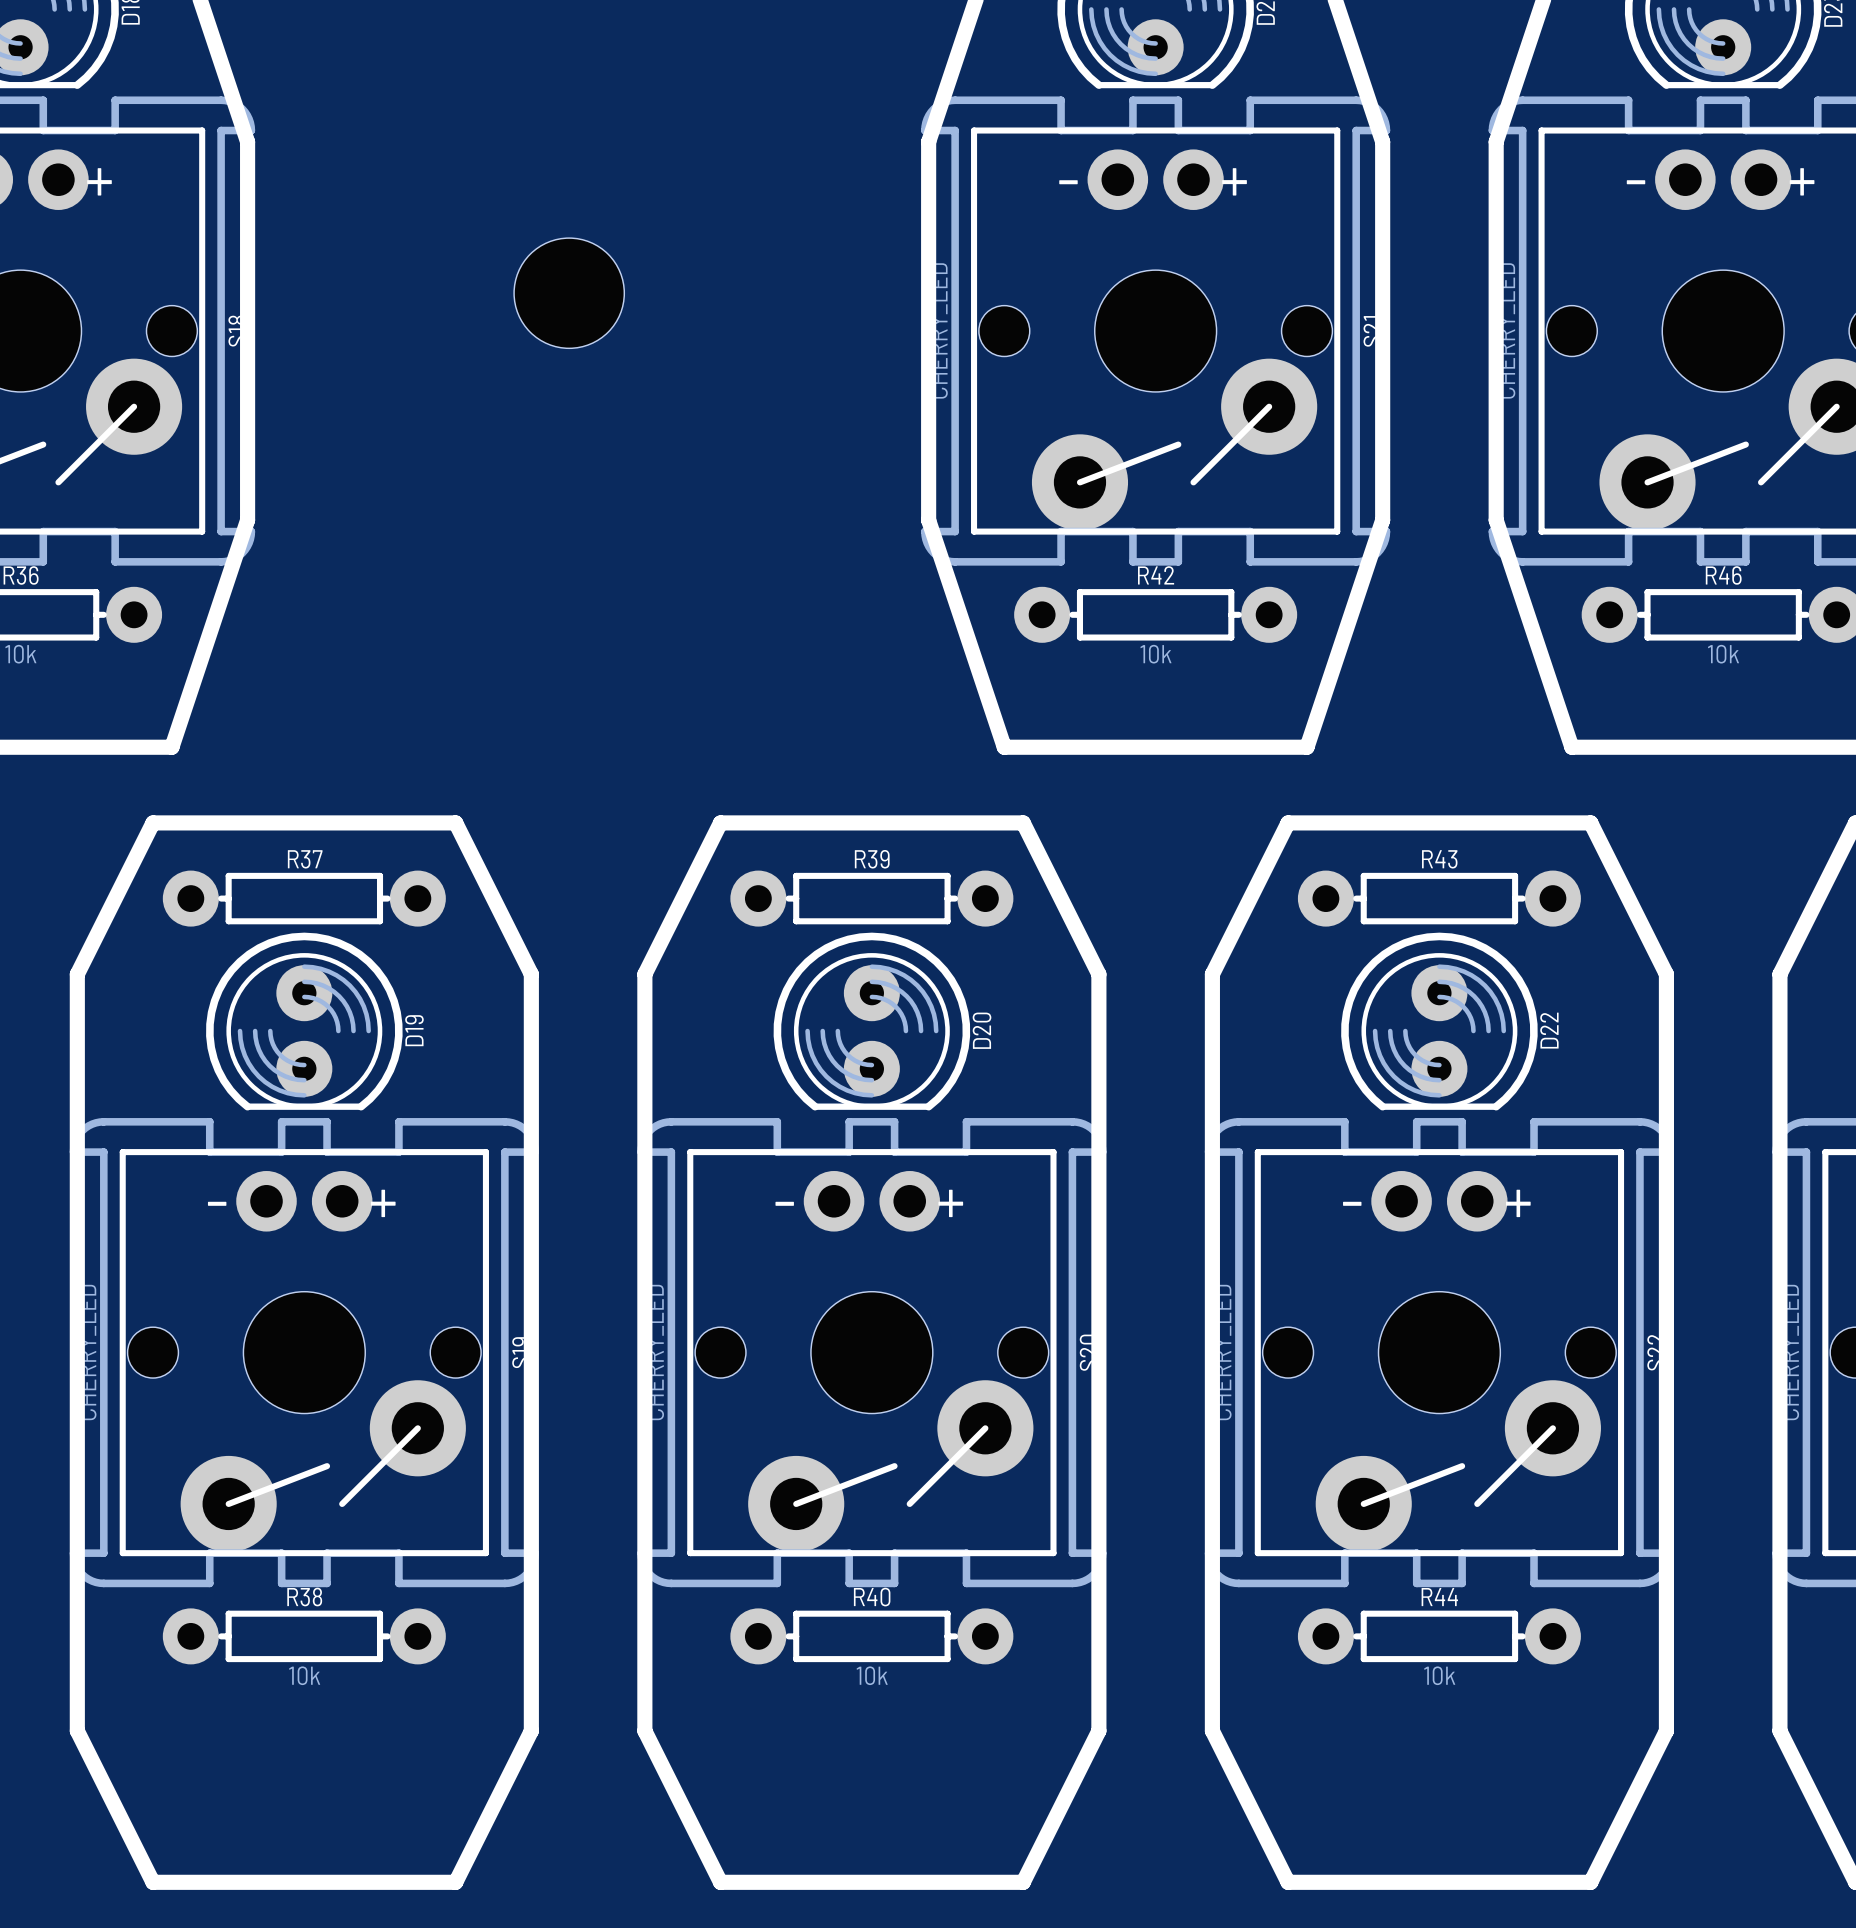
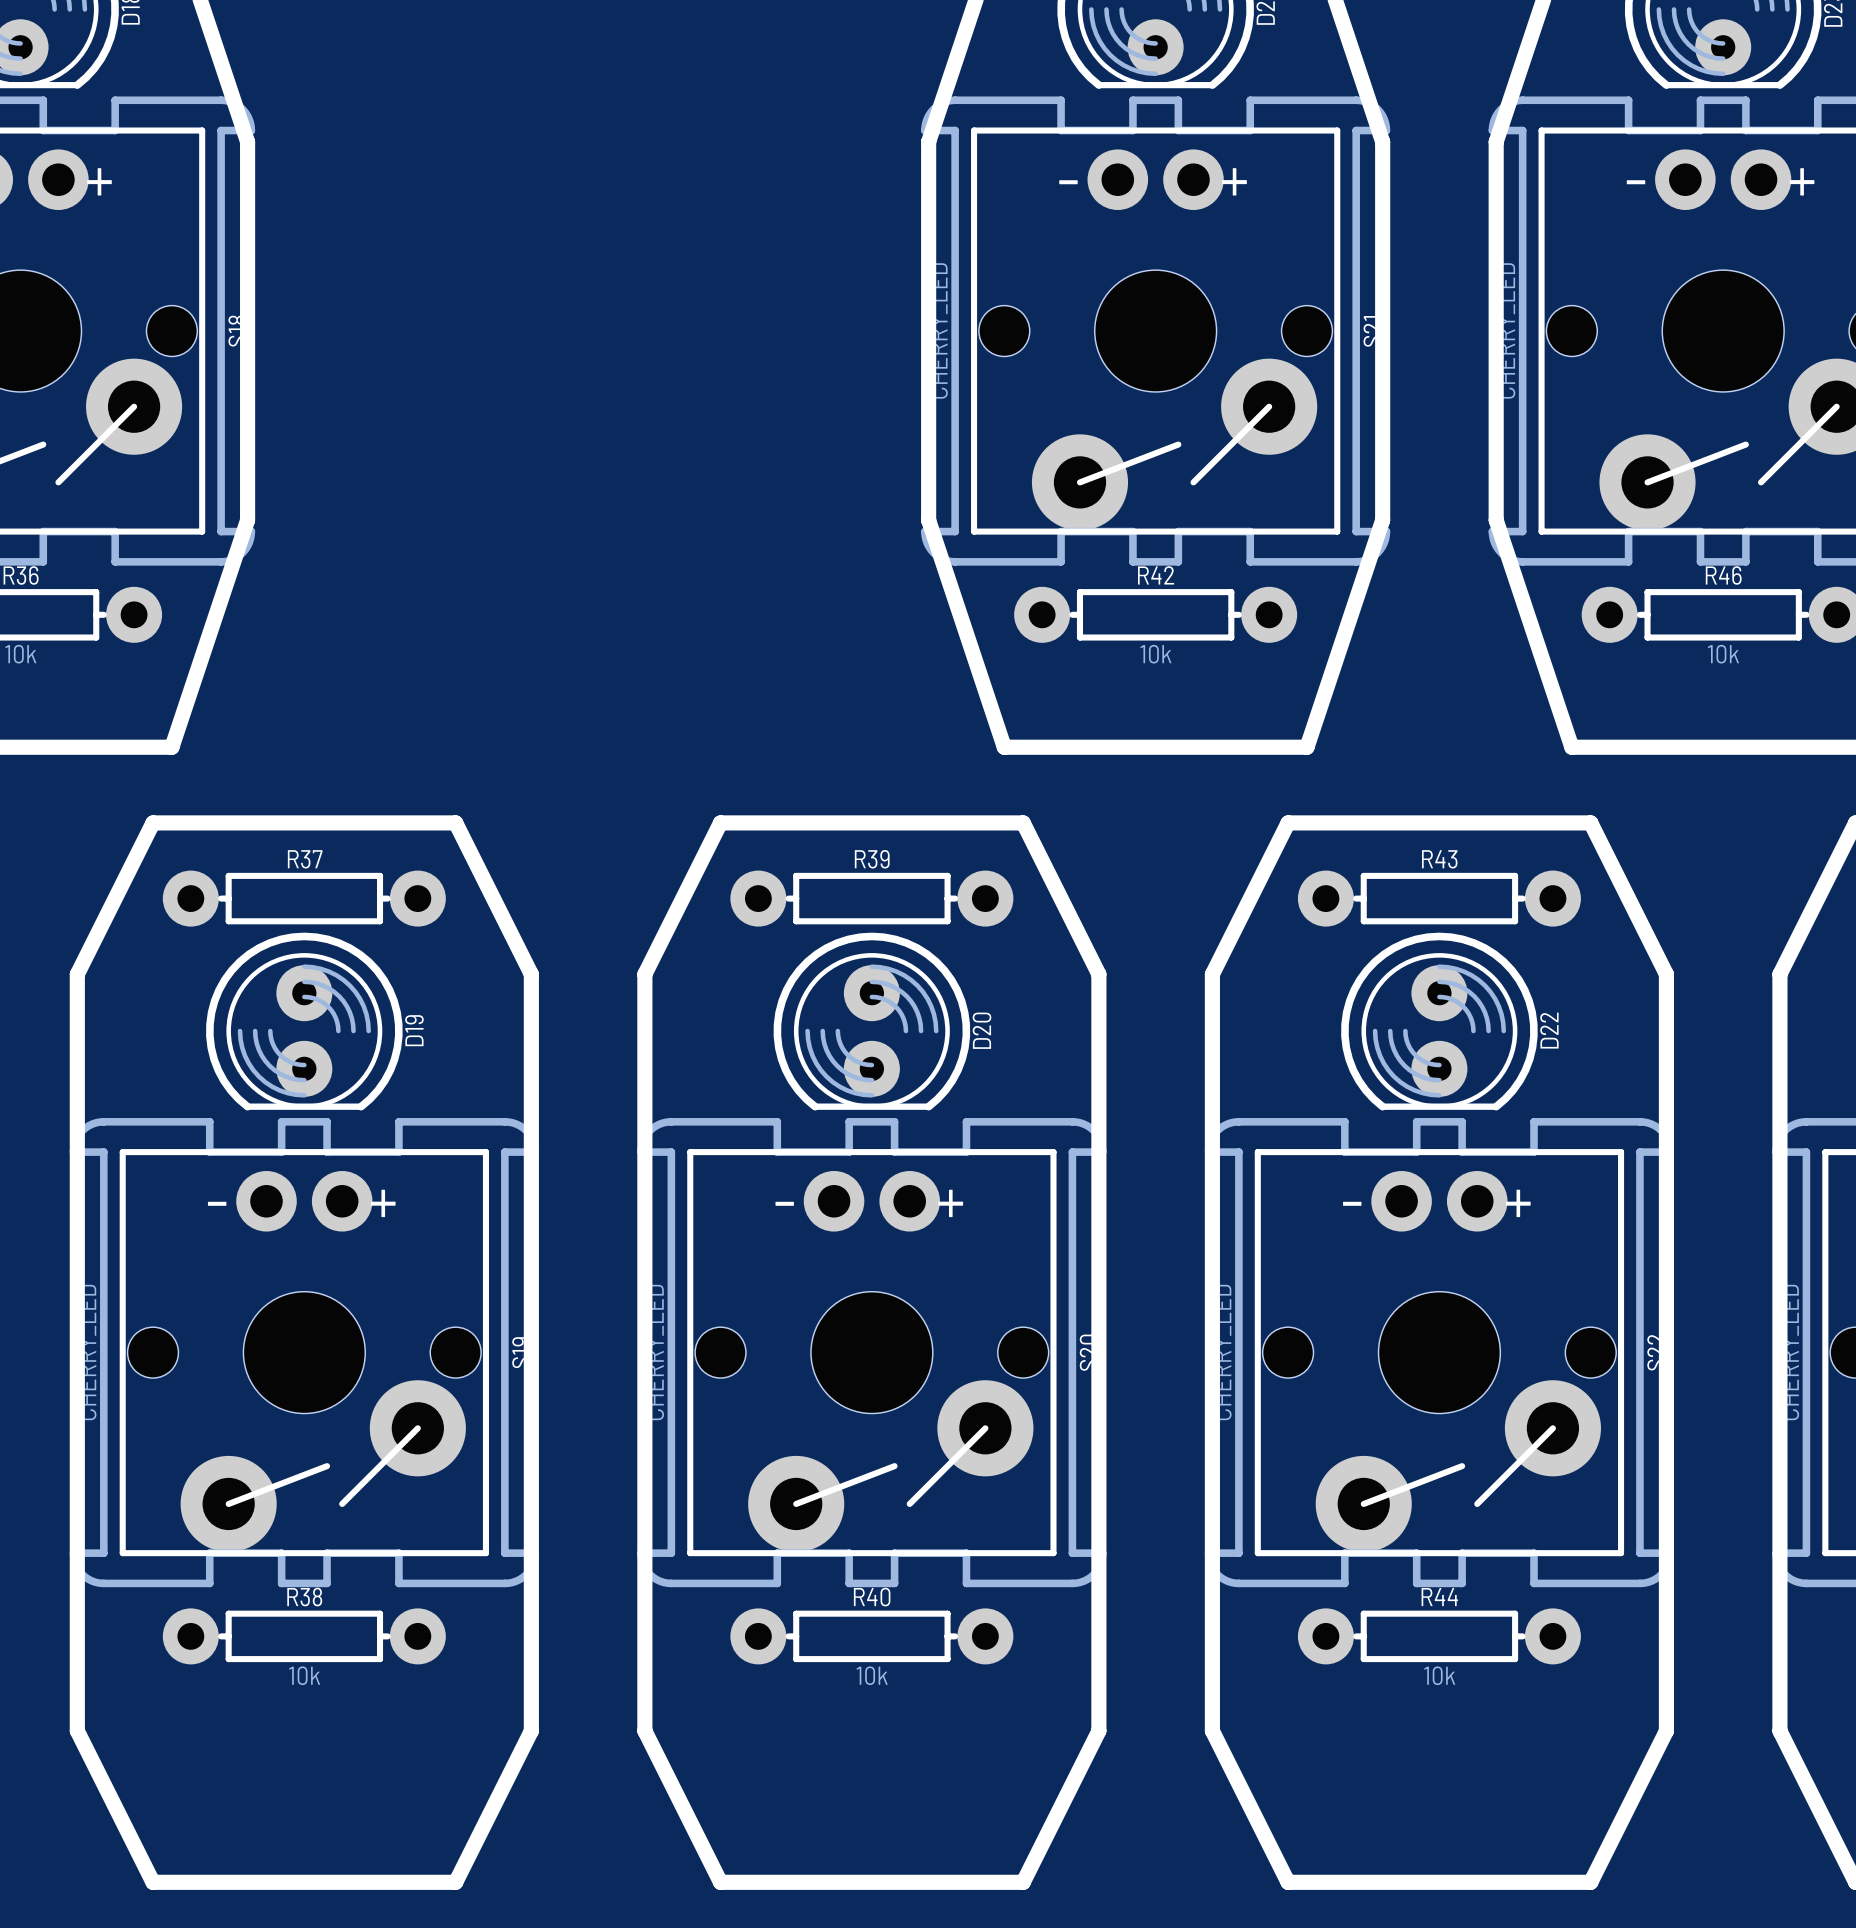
hole: (569, 293) -> none

